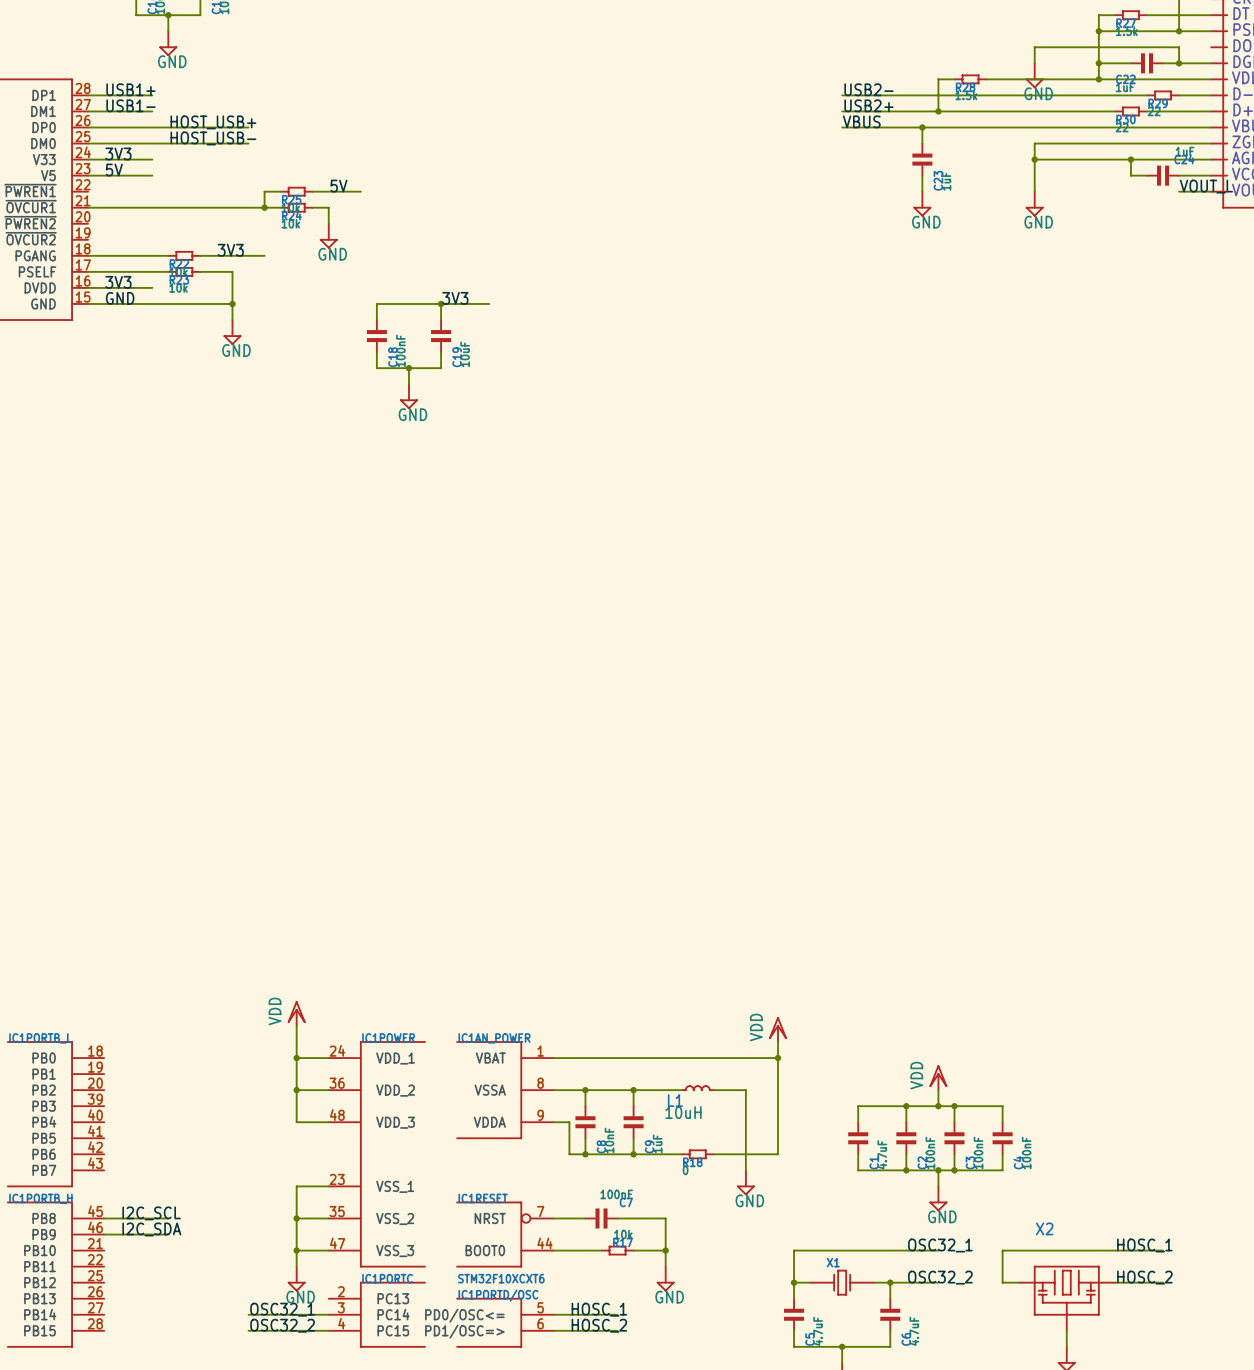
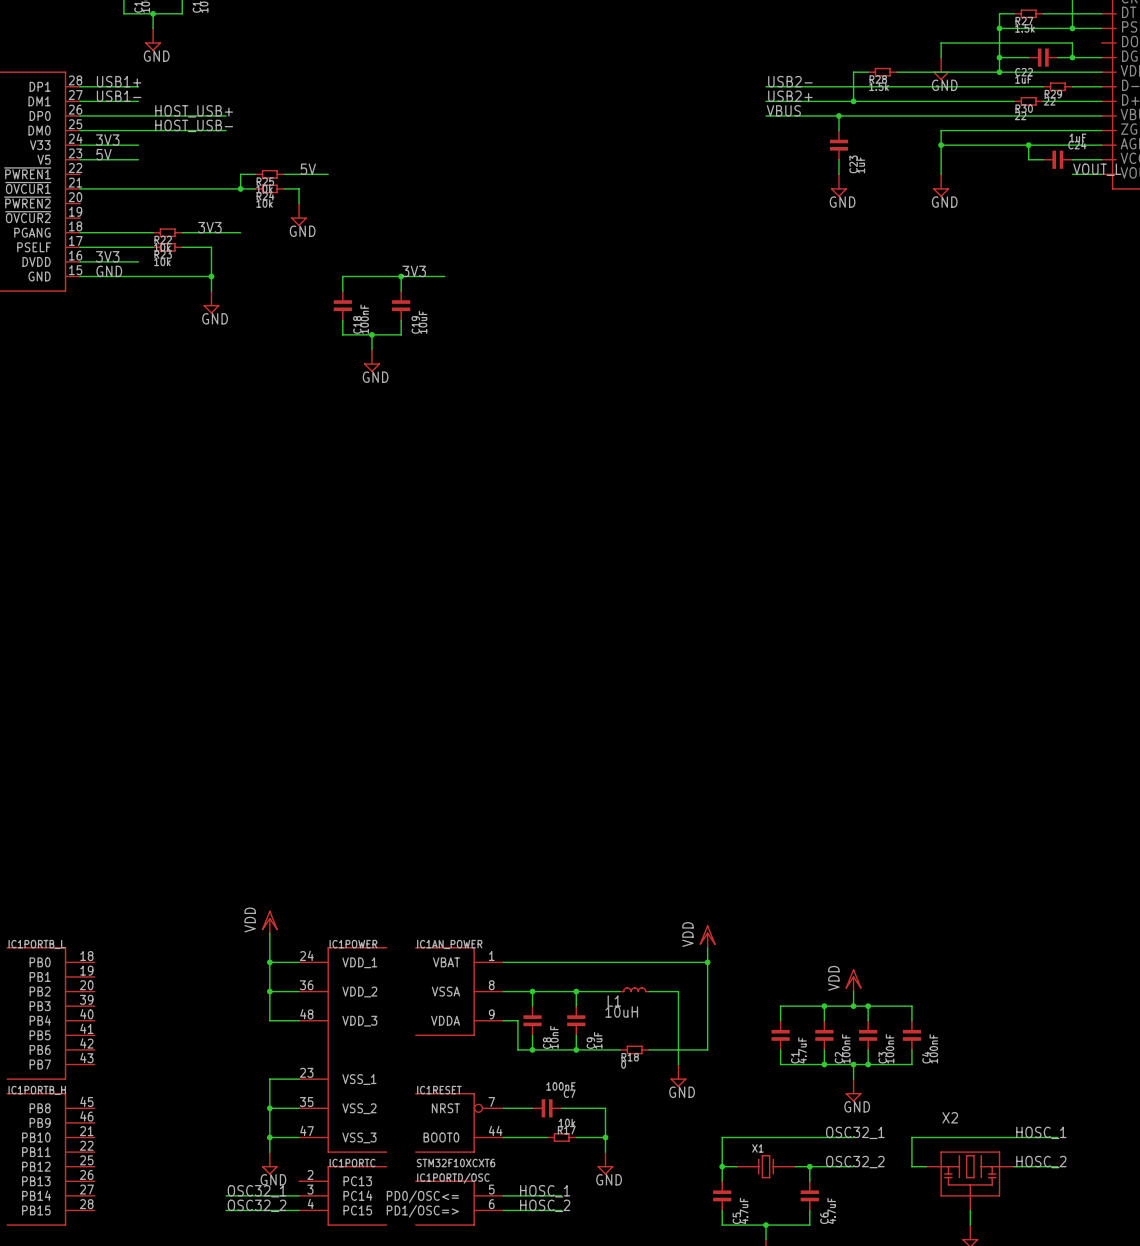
label: I2C_SCL (151, 1213) -> none
wire: (104, 1218) (168, 1218) -> none
label: I2C_SDA (151, 1229) -> none
wire: (104, 1234) (168, 1234) -> none

